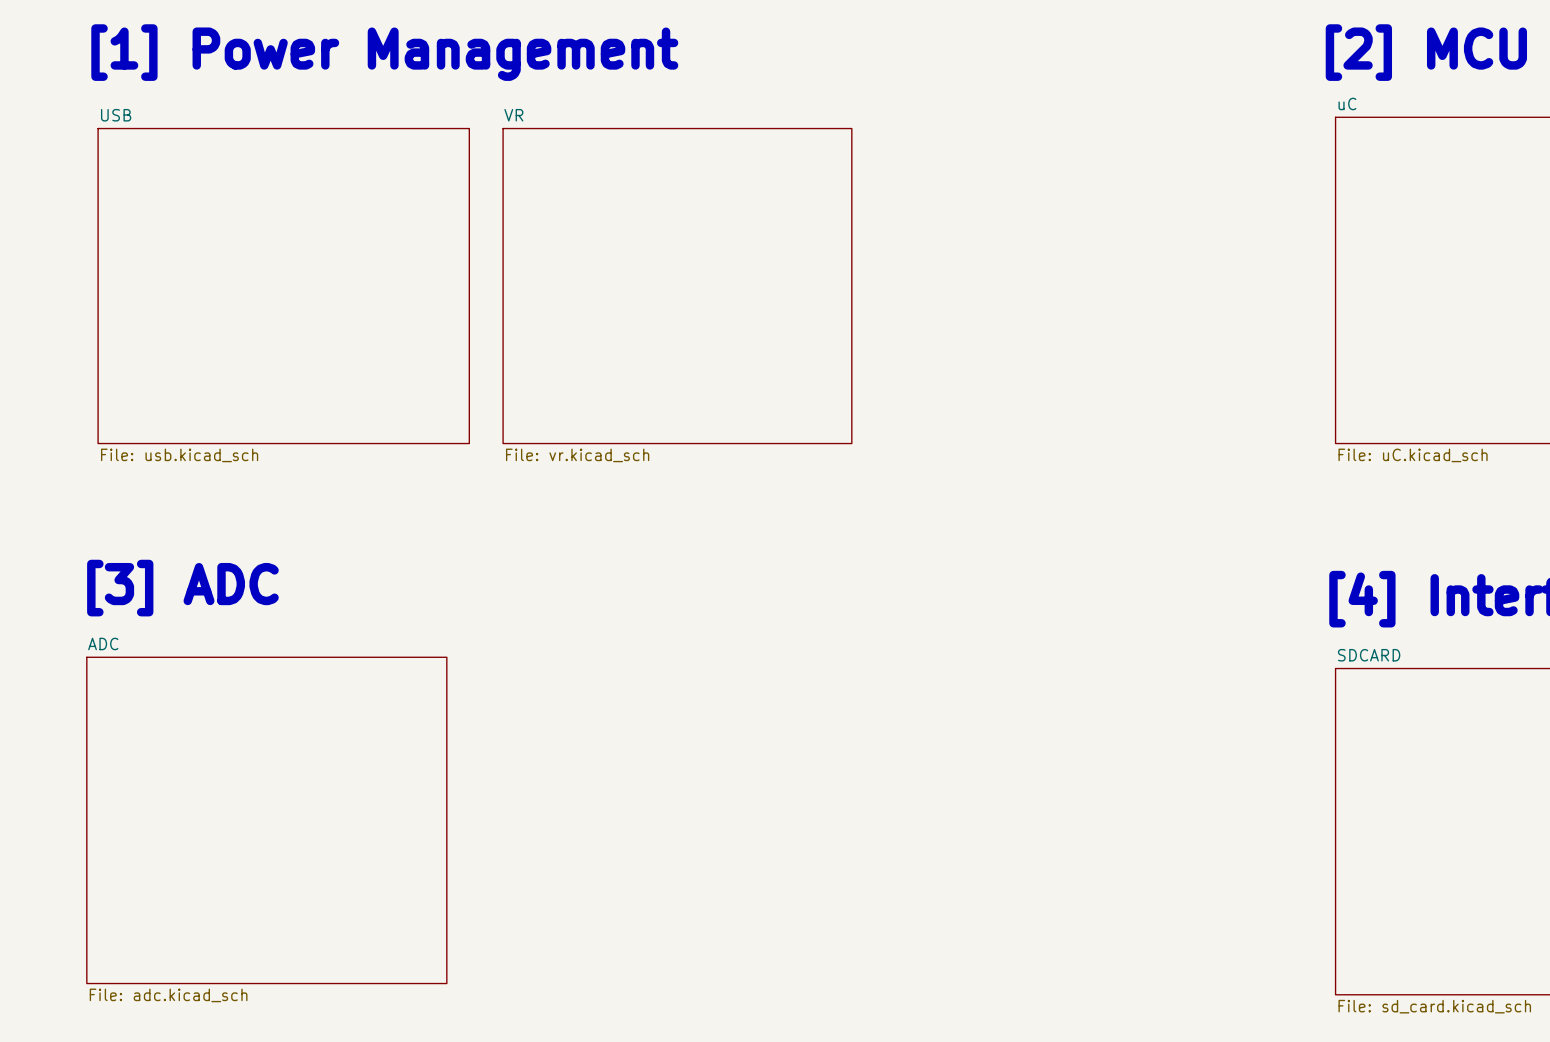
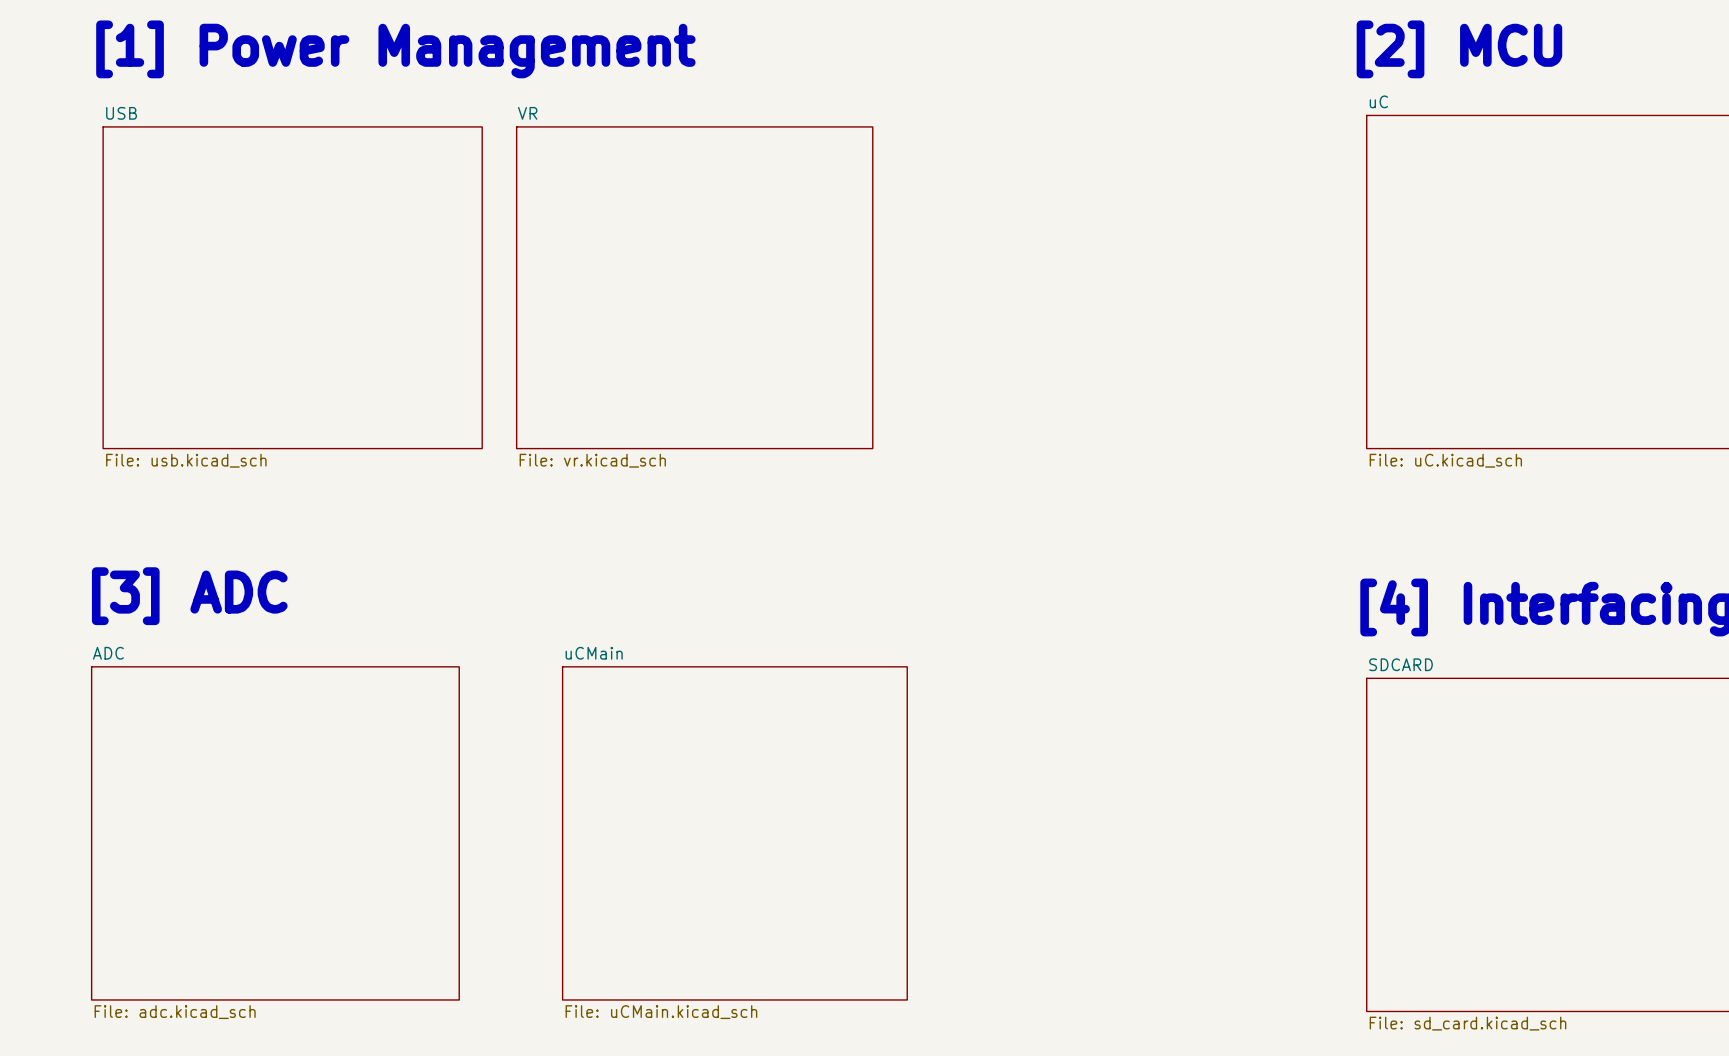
sheet uCMain: none -> File: uCMain.kicad_sch (734, 833)

